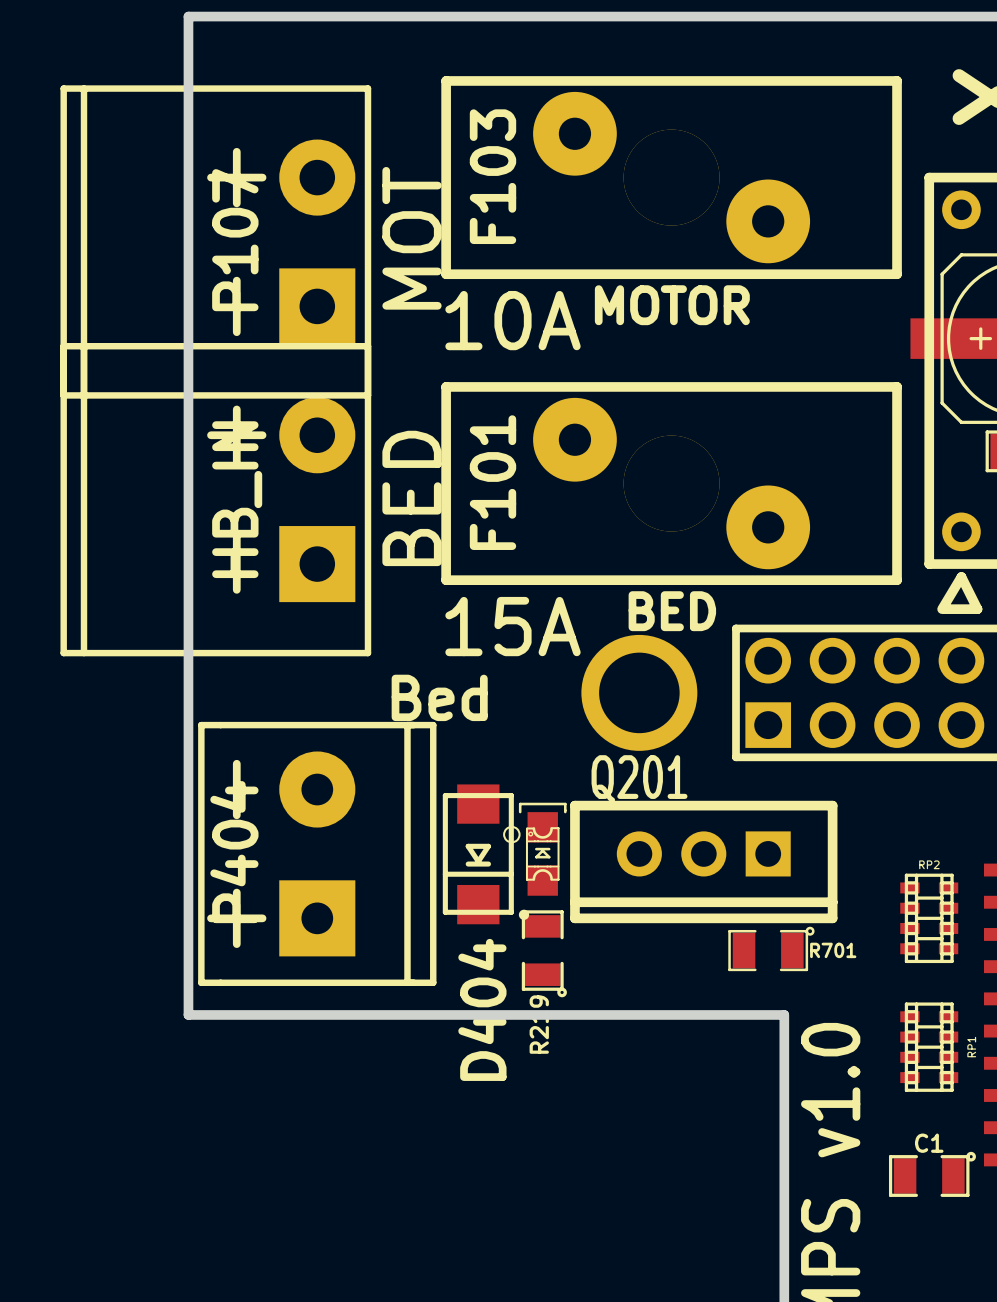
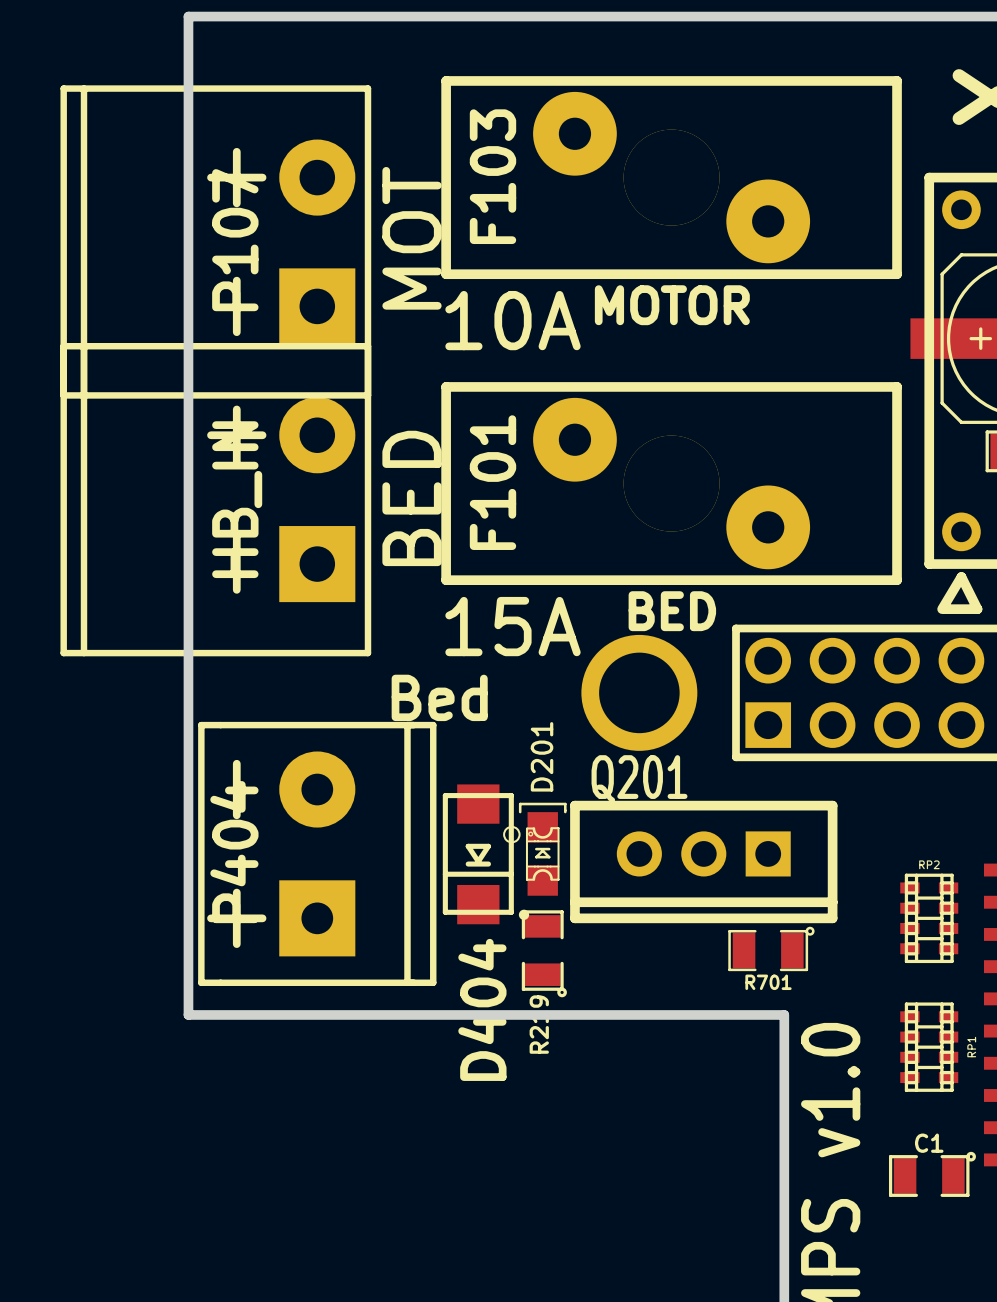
D201 name: none -> D201 (542, 756)
R701 name position: R701 (833, 950) -> R701 (768, 982)

